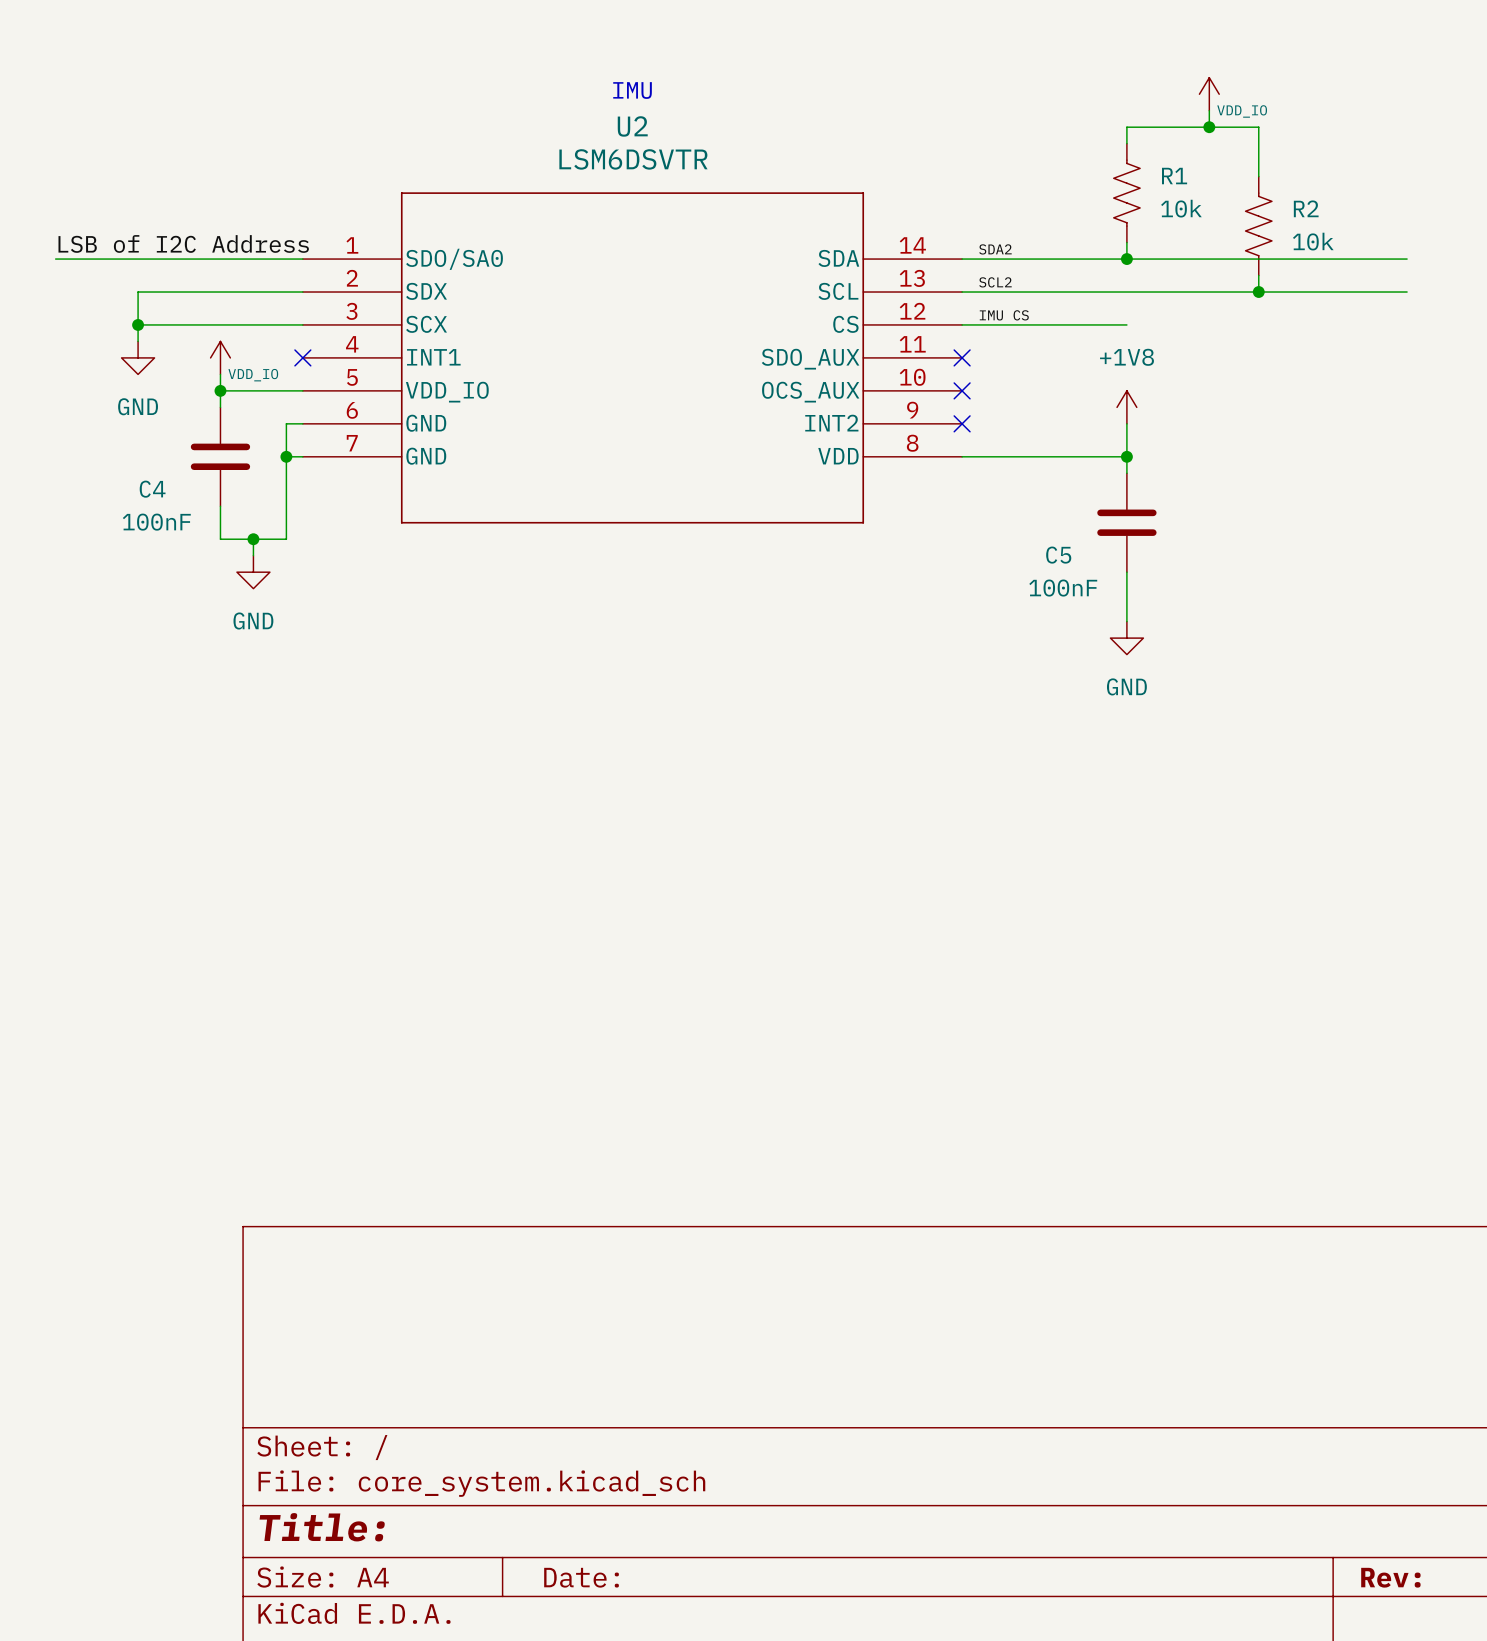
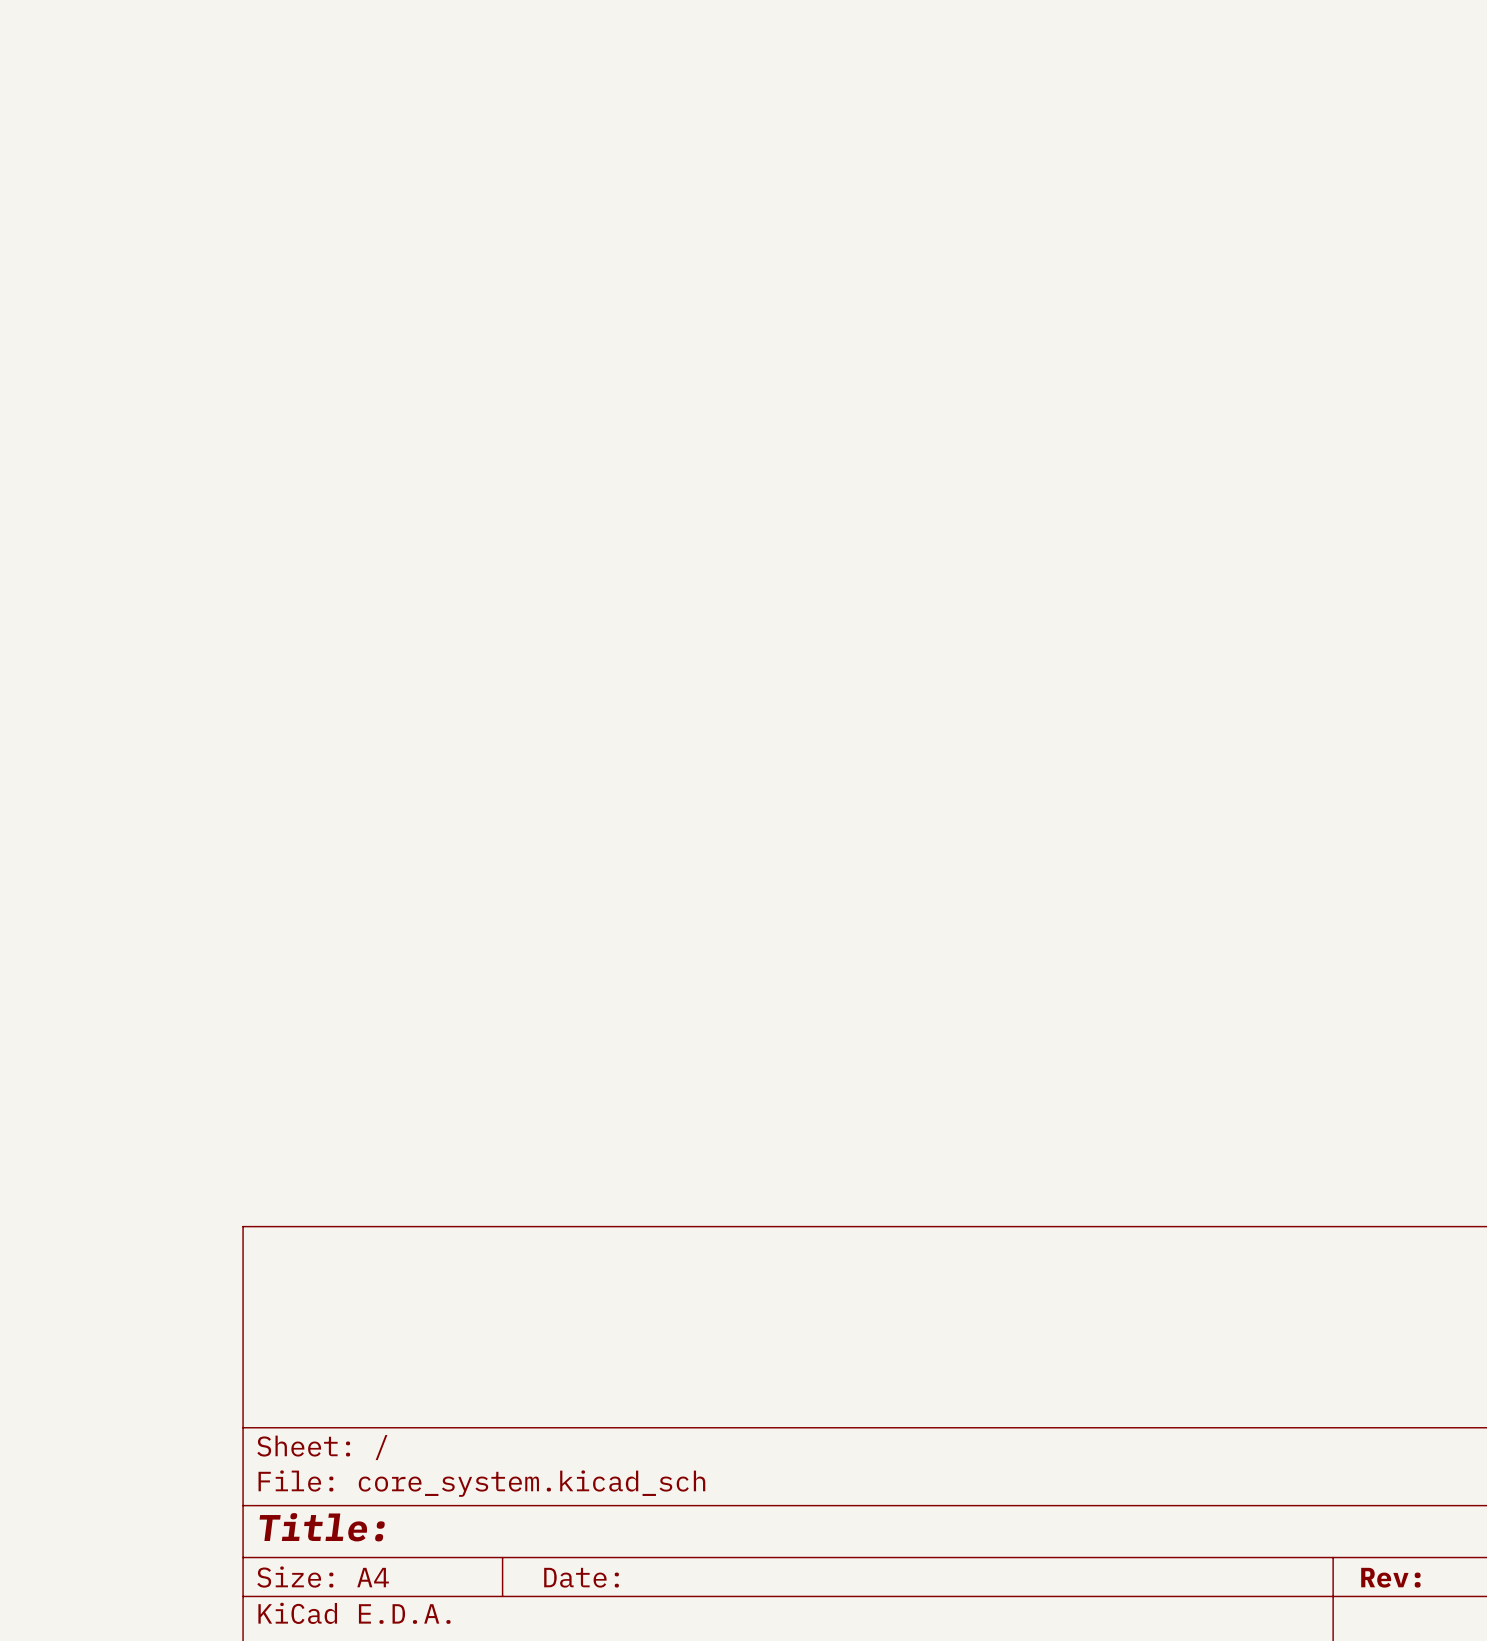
text: IMU (632, 90) -> none
power symbol: VDD_IO (1209, 94) -> none
wire: (1209, 110) (1209, 127) -> none
junction: (1209, 127) -> none
wire: (1126, 143) (1126, 127) (1258, 127) (1258, 176) -> none
R1: 10k (1126, 193) -> none
R2: 10k (1258, 226) -> none
wire: (1126, 242) (1126, 259) -> none
label: LSB of I2C Address (183, 243) -> none
label: SDA2 (995, 249) -> none
wire: (55, 259) (302, 259) -> none
wire: (962, 259) (1407, 259) -> none
junction: (1126, 259) -> none
wire: (1258, 275) (1258, 292) -> none
label: SCL2 (995, 282) -> none
wire: (302, 292) (138, 292) (138, 341) -> none
wire: (962, 292) (1407, 292) -> none
junction: (1258, 292) -> none
label: IMU CS (1004, 315) -> none
wire: (138, 324) (302, 324) -> none
junction: (138, 324) -> none
wire: (962, 324) (1126, 324) -> none
power symbol: GND (138, 357) -> none
power symbol: VDD_IO (220, 357) -> none
no-connect mark: (302, 357) -> none
U2: LSM6DSVTR (632, 357) -> none
no-connect mark: (962, 357) -> none
wire: (220, 374) (220, 407) -> none
wire: (220, 390) (302, 390) -> none
junction: (220, 390) -> none
no-connect mark: (962, 390) -> none
power symbol: +1V8 (1126, 407) -> none
wire: (302, 423) (286, 423) (286, 539) (220, 539) (220, 506) -> none
no-connect mark: (962, 423) -> none
wire: (1126, 423) (1126, 473) -> none
C4: 100nF (220, 456) -> none
wire: (286, 456) (302, 456) -> none
junction: (286, 456) -> none
wire: (962, 456) (1126, 456) -> none
junction: (1126, 456) -> none
C5: 100nF (1126, 522) -> none
wire: (253, 539) (253, 555) -> none
junction: (253, 539) -> none
power symbol: GND (253, 572) -> none
wire: (1126, 572) (1126, 621) -> none
power symbol: GND (1126, 638) -> none

